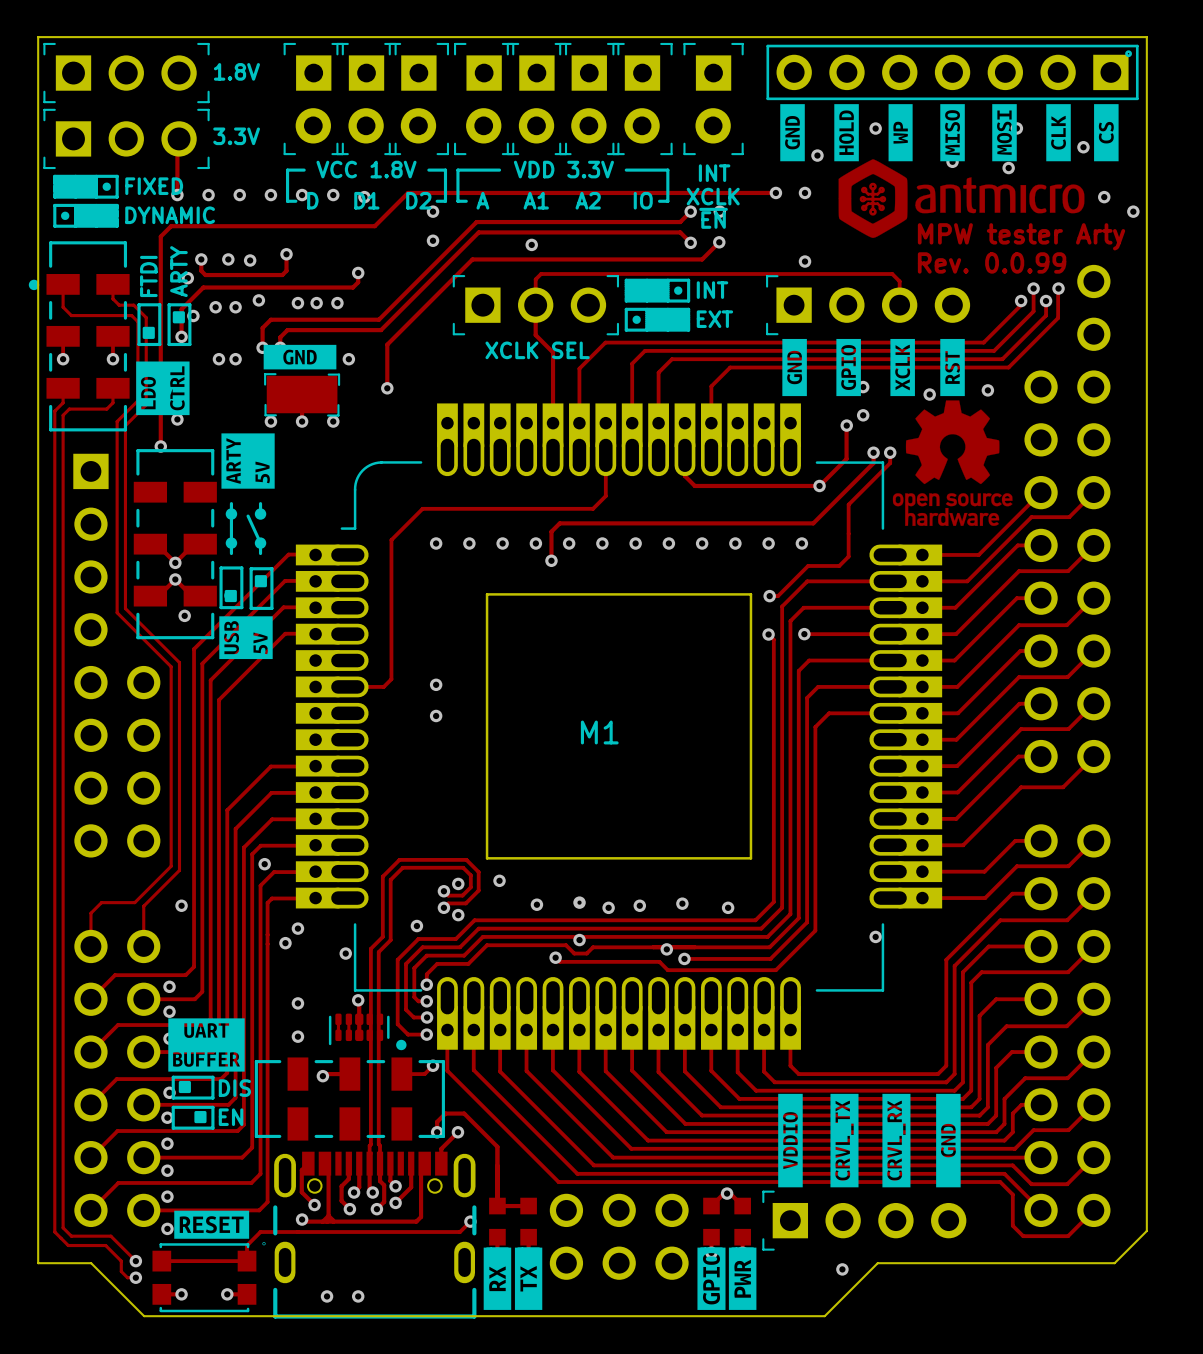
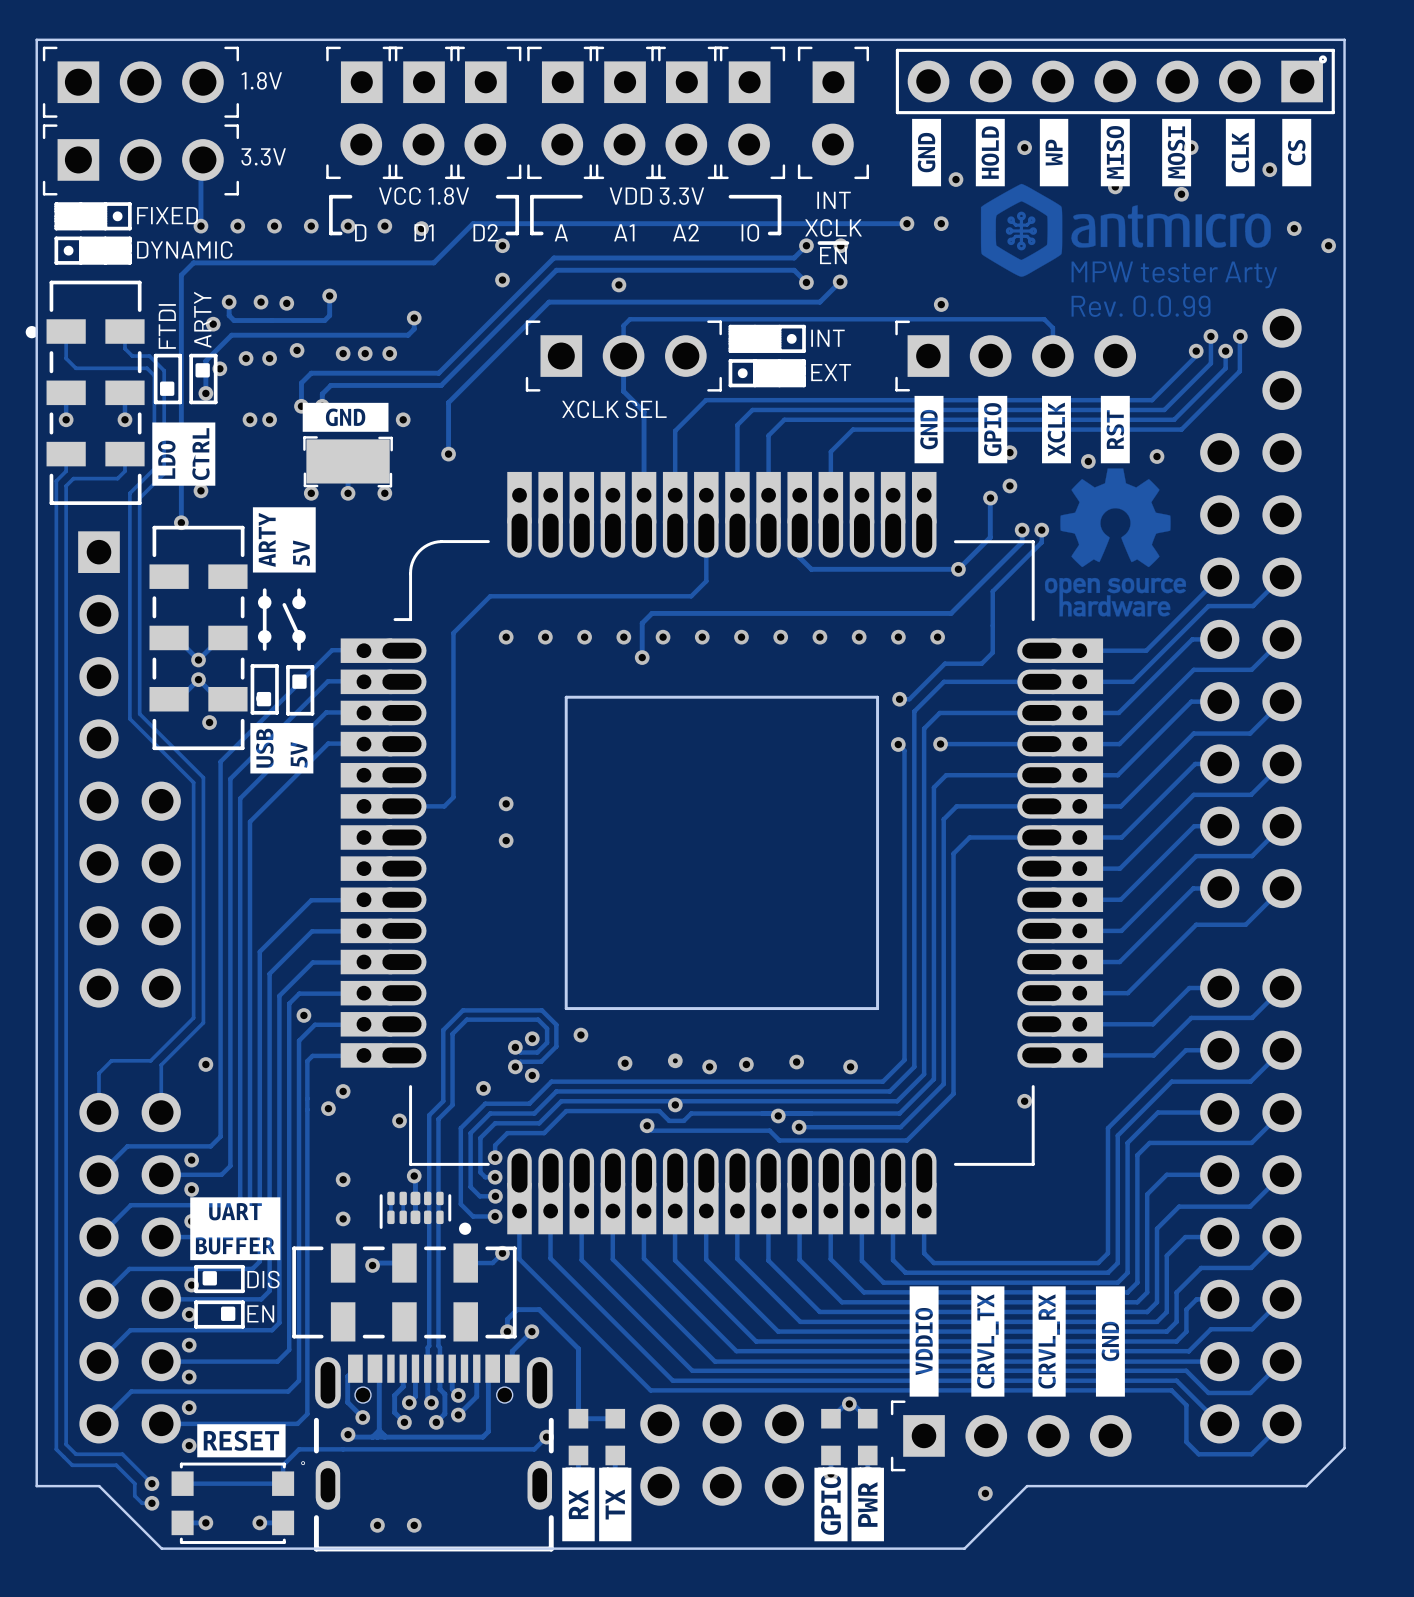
M1: (599, 732) -> none

